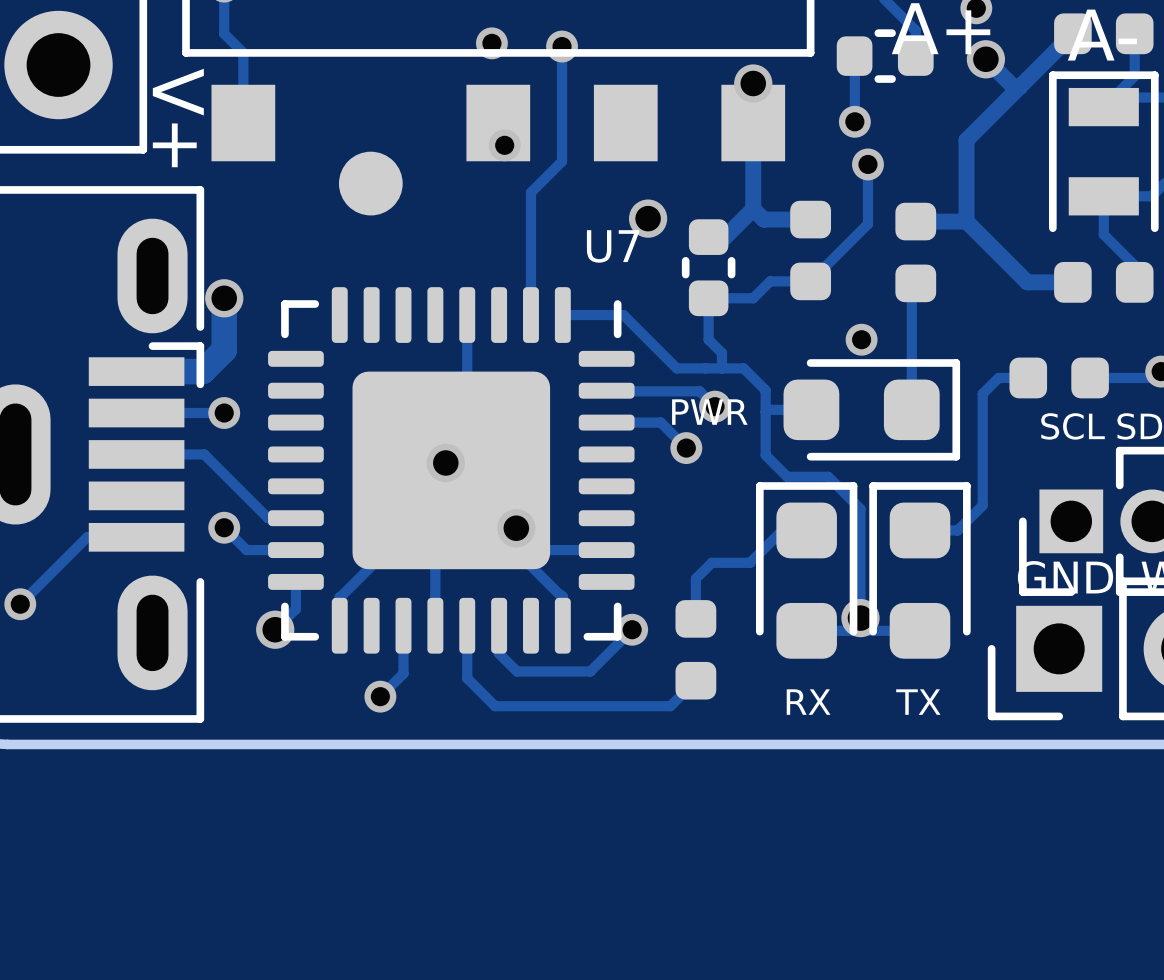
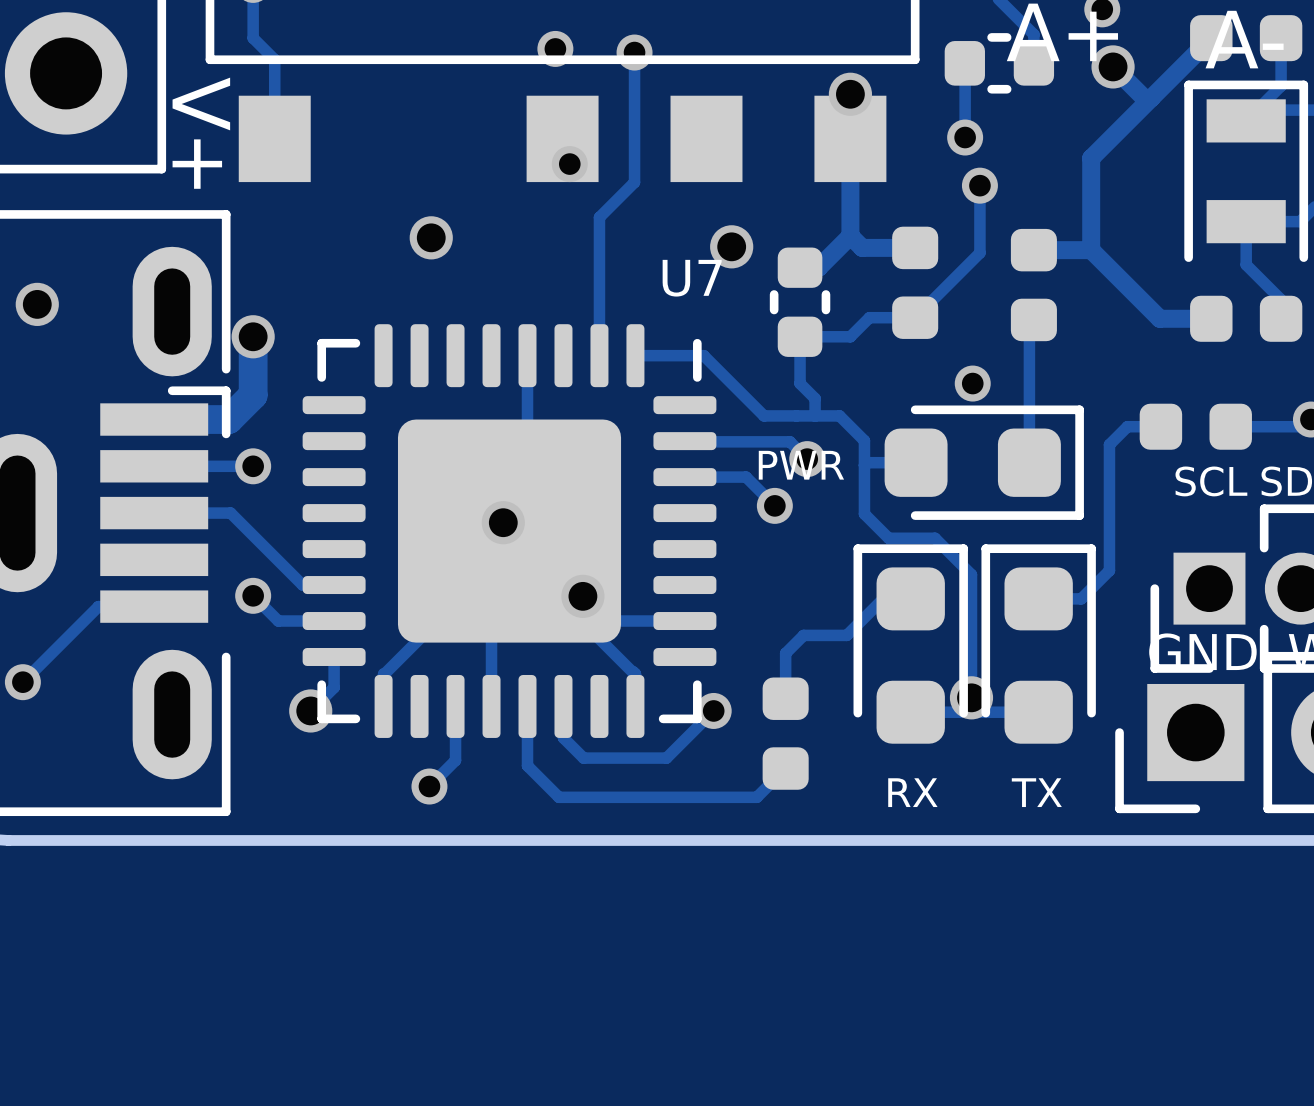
part: (370, 183) -> none
via: none -> (431, 237)
via: none -> (37, 304)

